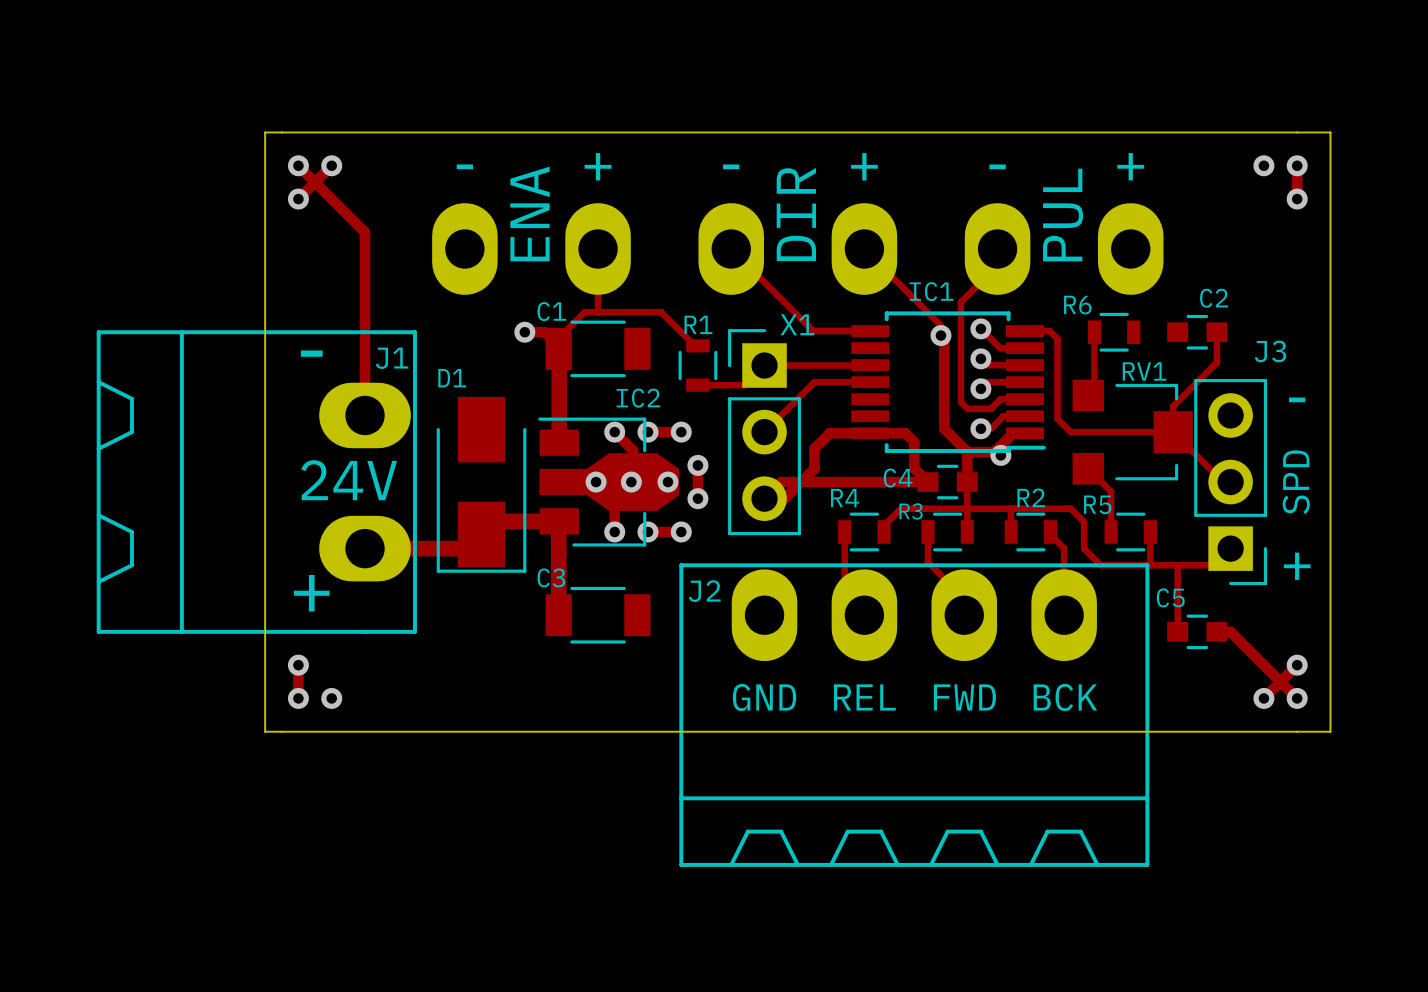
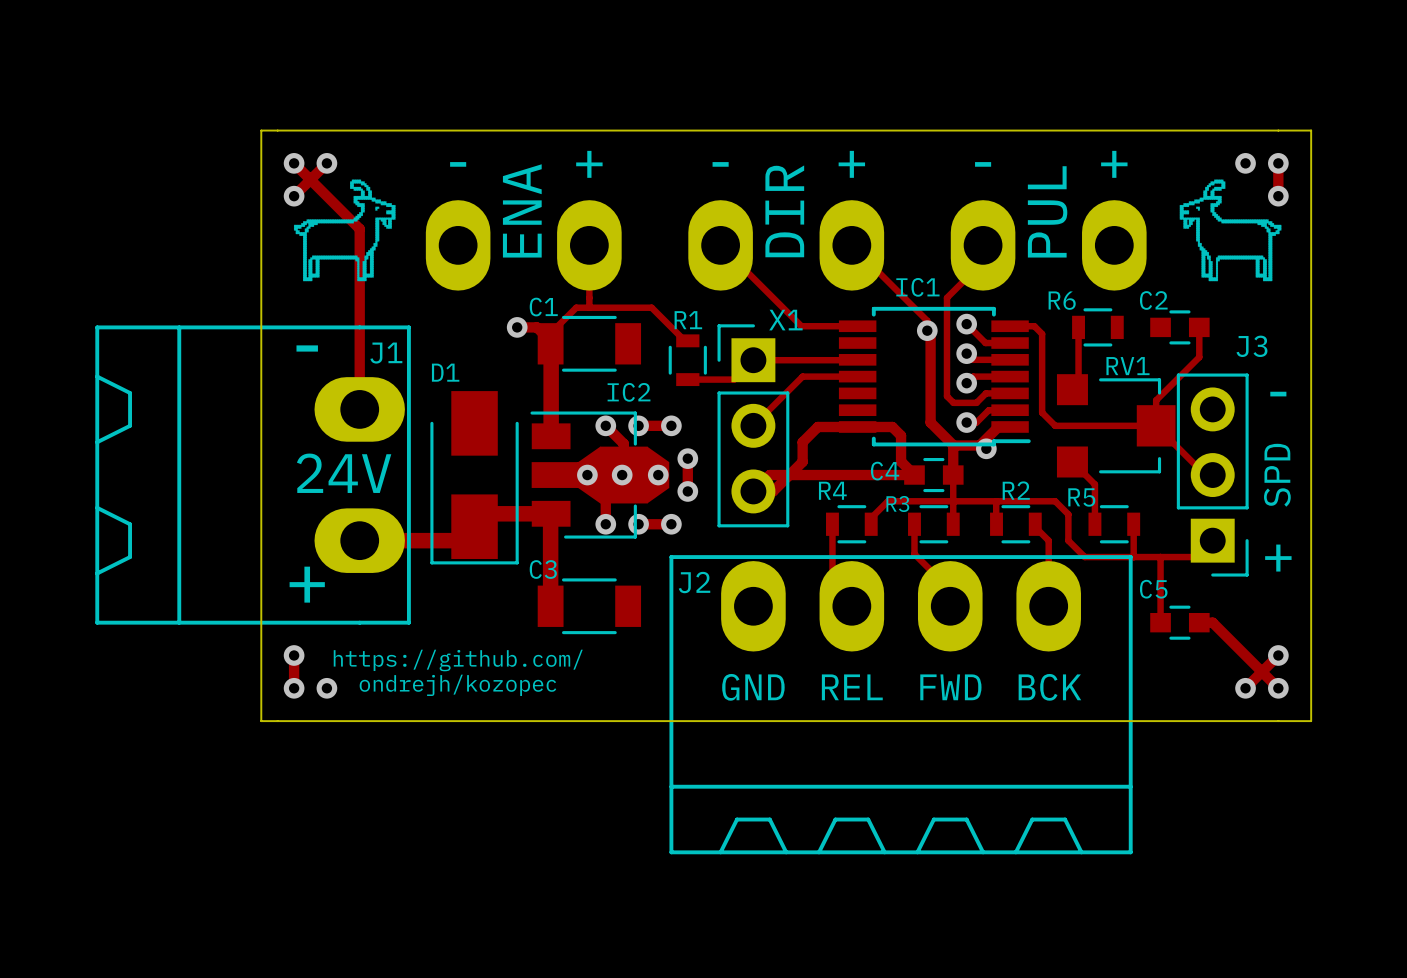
drawing: none -> [293, 179, 396, 282]
drawing: none -> [1179, 179, 1282, 282]
C2 name position: C2 (1214, 298) -> C2 (1153, 300)
text: none -> https://github.com/ (458, 660)
text: none -> ondrejh/kozopec (457, 685)

